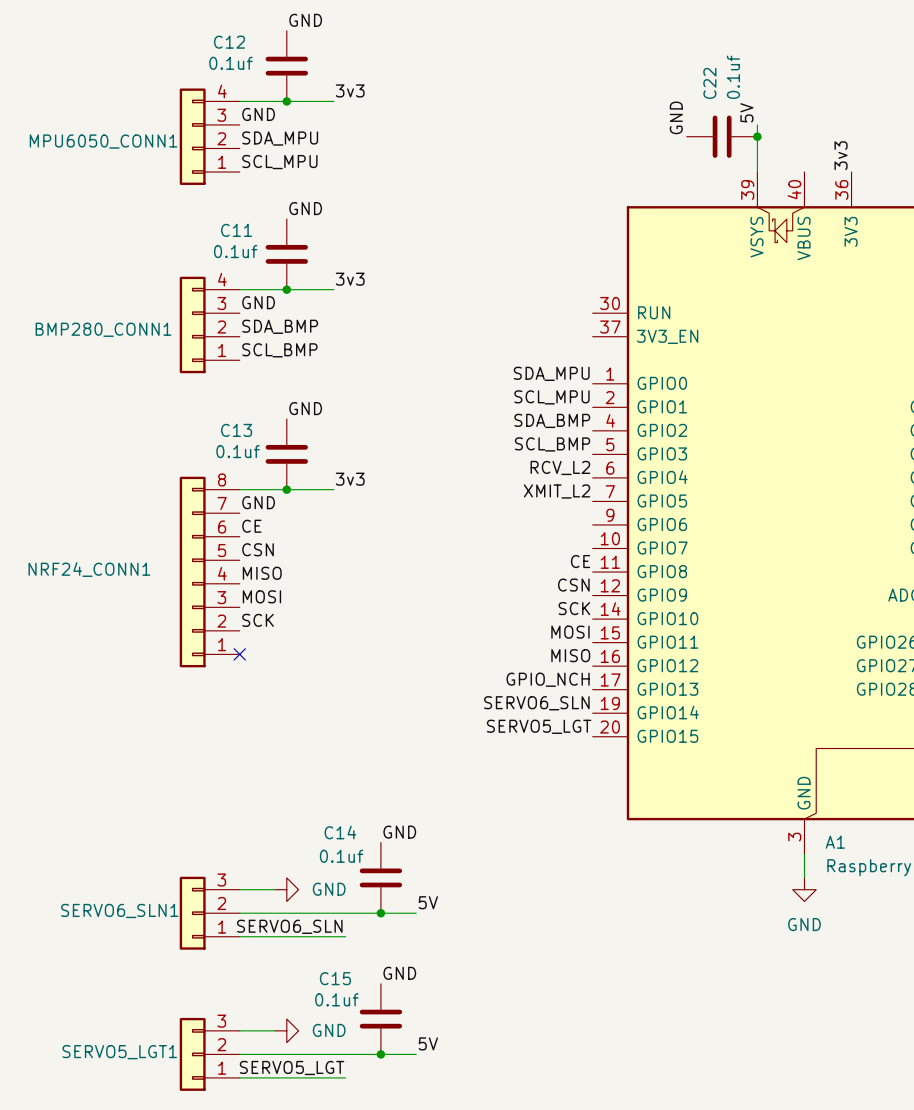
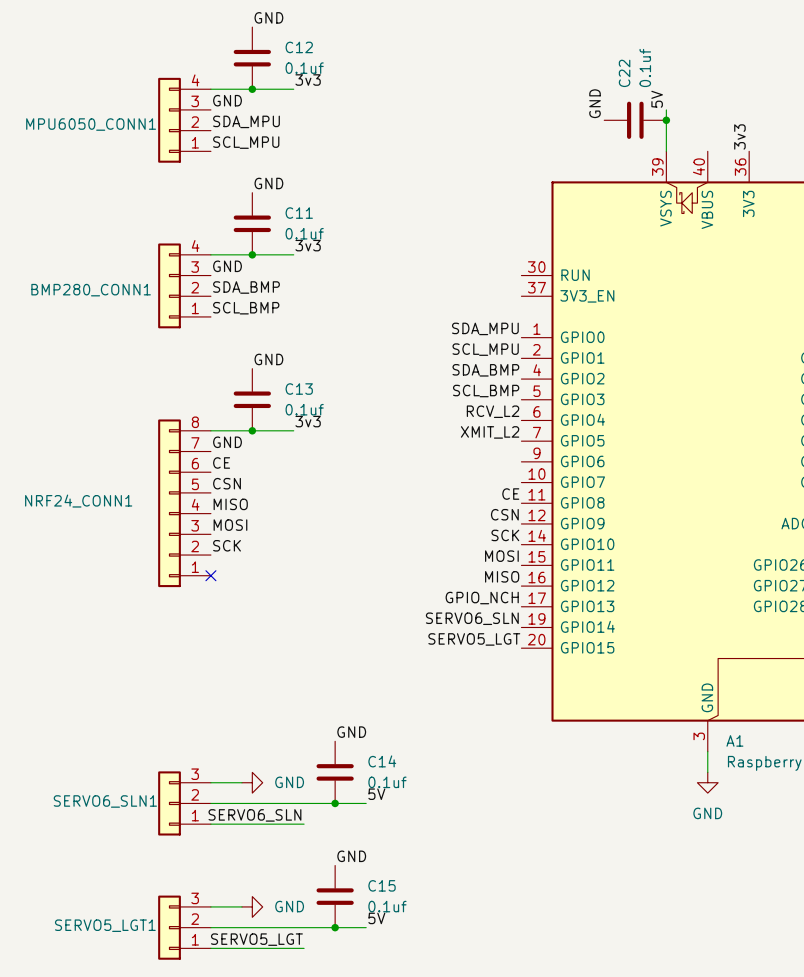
C12 name position: C12 (229, 42) -> C12 (299, 47)
C12 value position: 0.1uf (230, 63) -> 0.1uf (304, 68)
C11 name position: C11 (236, 230) -> C11 (299, 213)
C11 value position: 0.1uf (235, 251) -> 0.1uf (304, 233)
C13 name position: C13 (236, 430) -> C13 (299, 389)
C13 value position: 0.1uf (238, 451) -> 0.1uf (304, 409)
C14 name position: C14 (340, 832) -> C14 (382, 761)
C14 value position: 0.1uf (341, 856) -> 0.1uf (387, 782)
C15 name position: C15 (335, 978) -> C15 (382, 885)
C15 value position: 0.1uf (336, 999) -> 0.1uf (387, 906)

